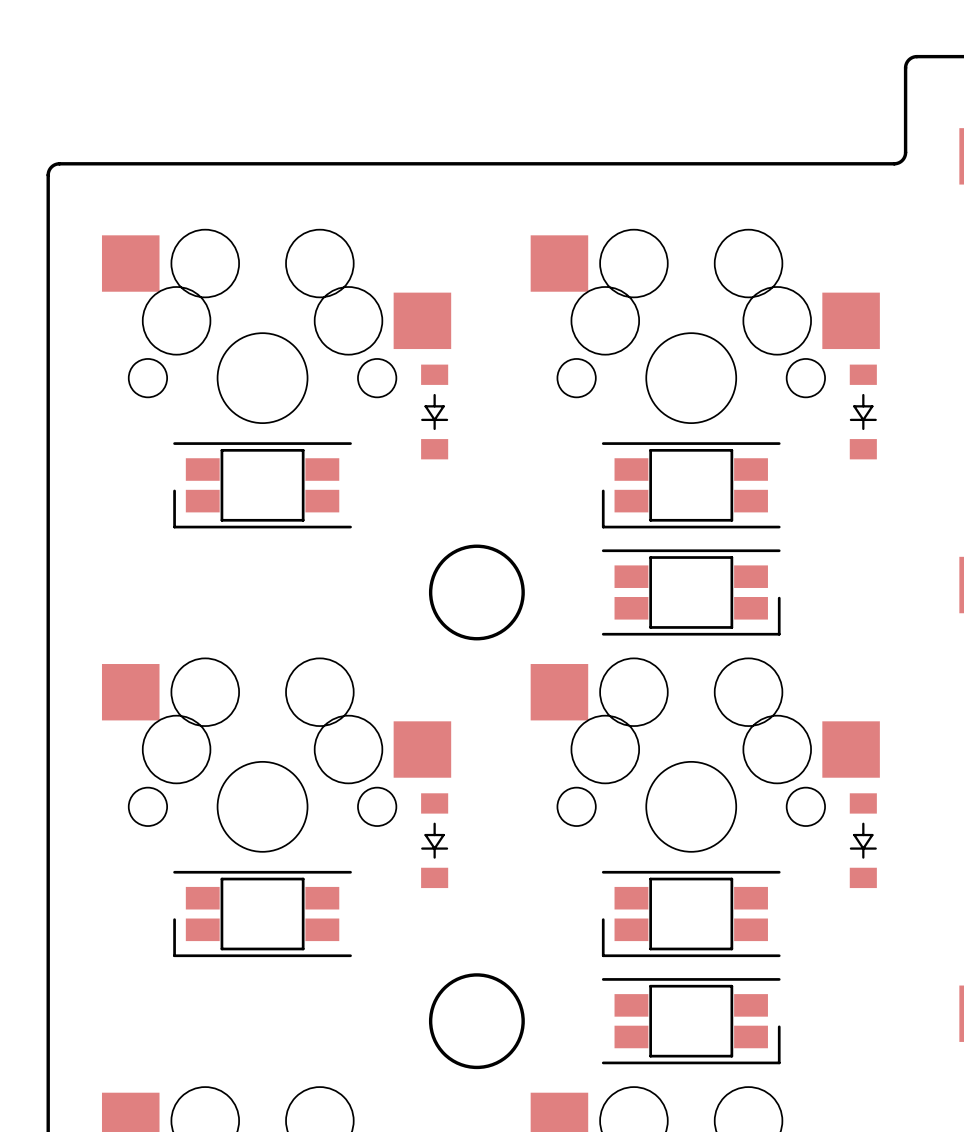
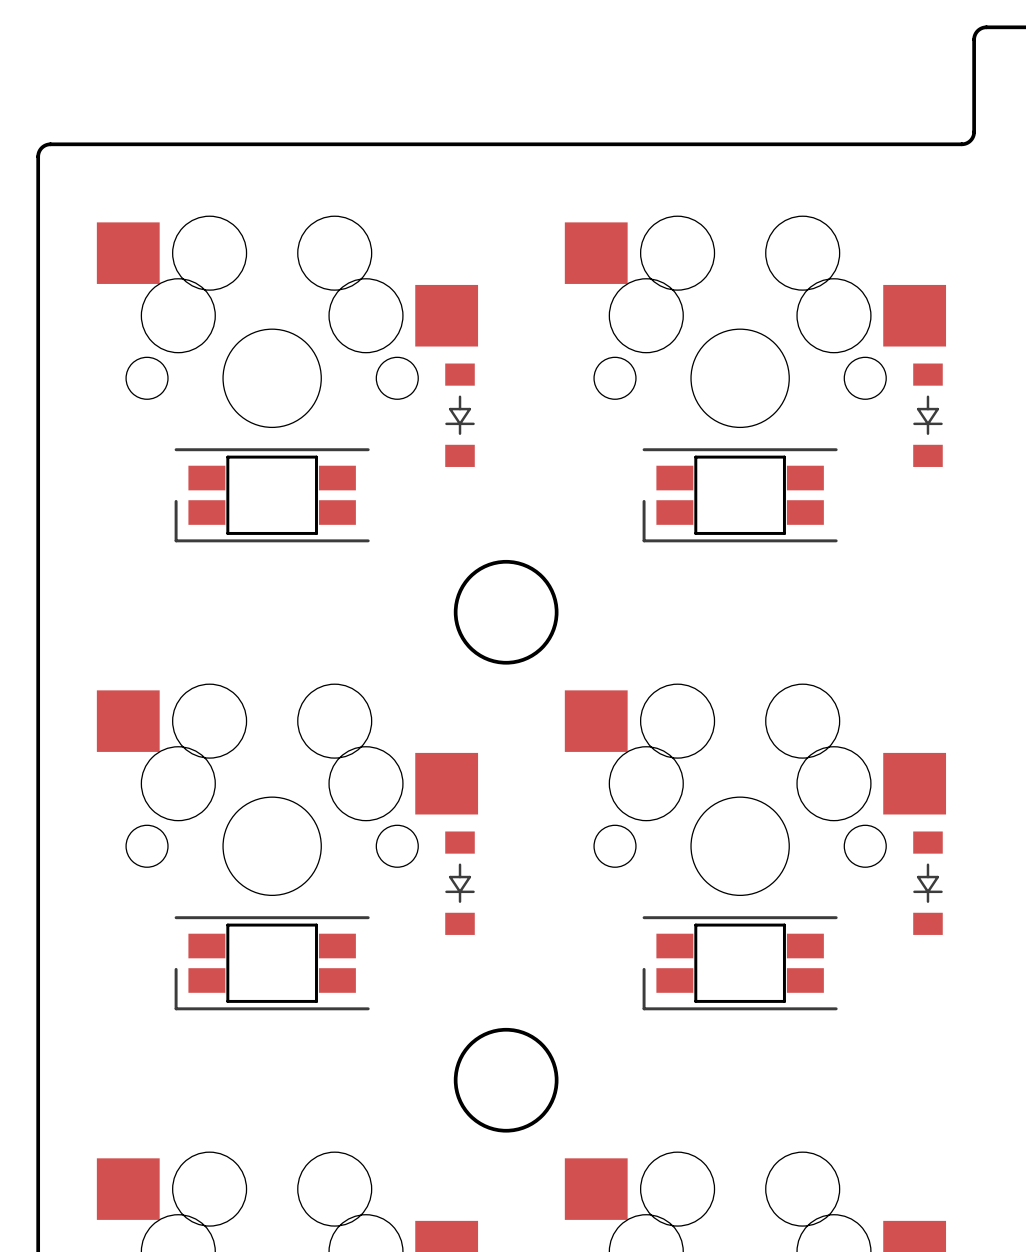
part: (691, 592) -> none
part: (691, 1021) -> none

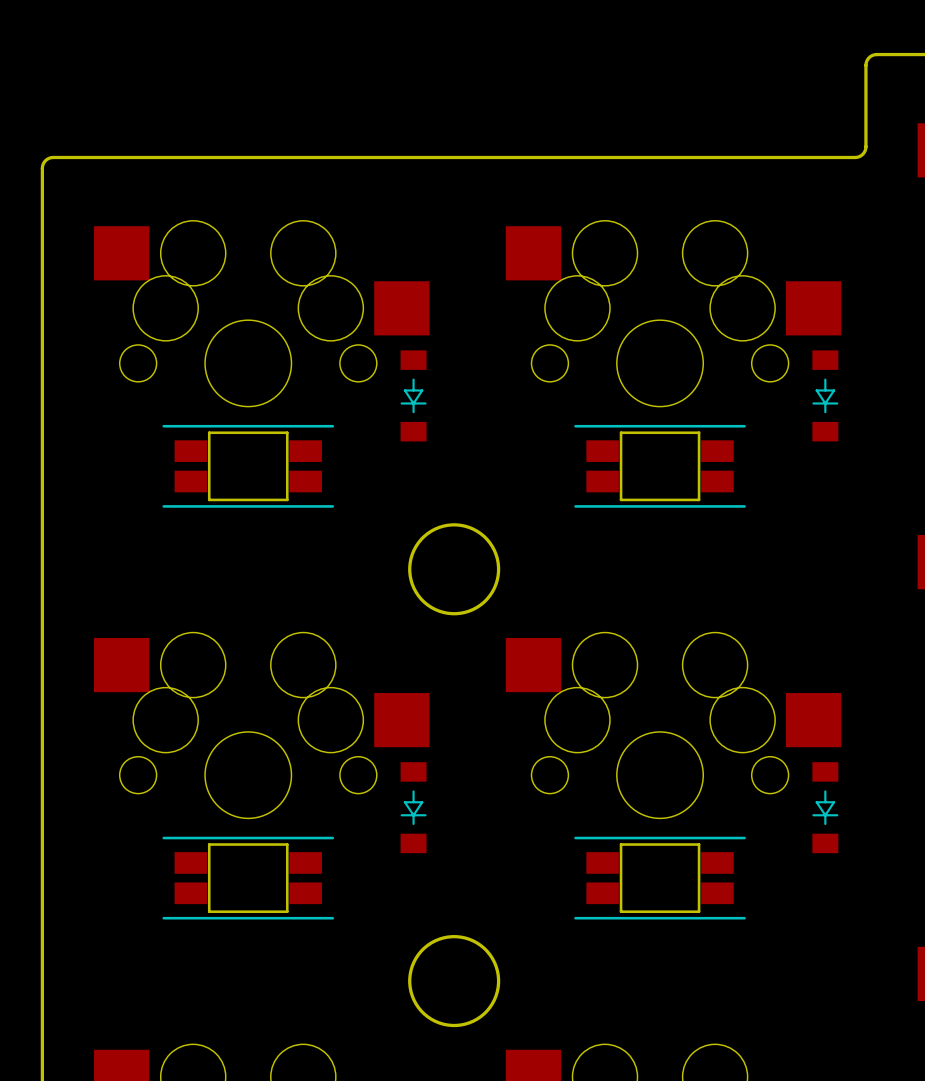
part footprint: [174, 448, 370, 543] -> [162, 424, 335, 508]
part footprint: [642, 448, 838, 543] -> [574, 424, 746, 508]
part footprint: [174, 916, 370, 1011] -> [162, 836, 335, 920]
part footprint: [642, 916, 838, 1011] -> [574, 836, 746, 920]

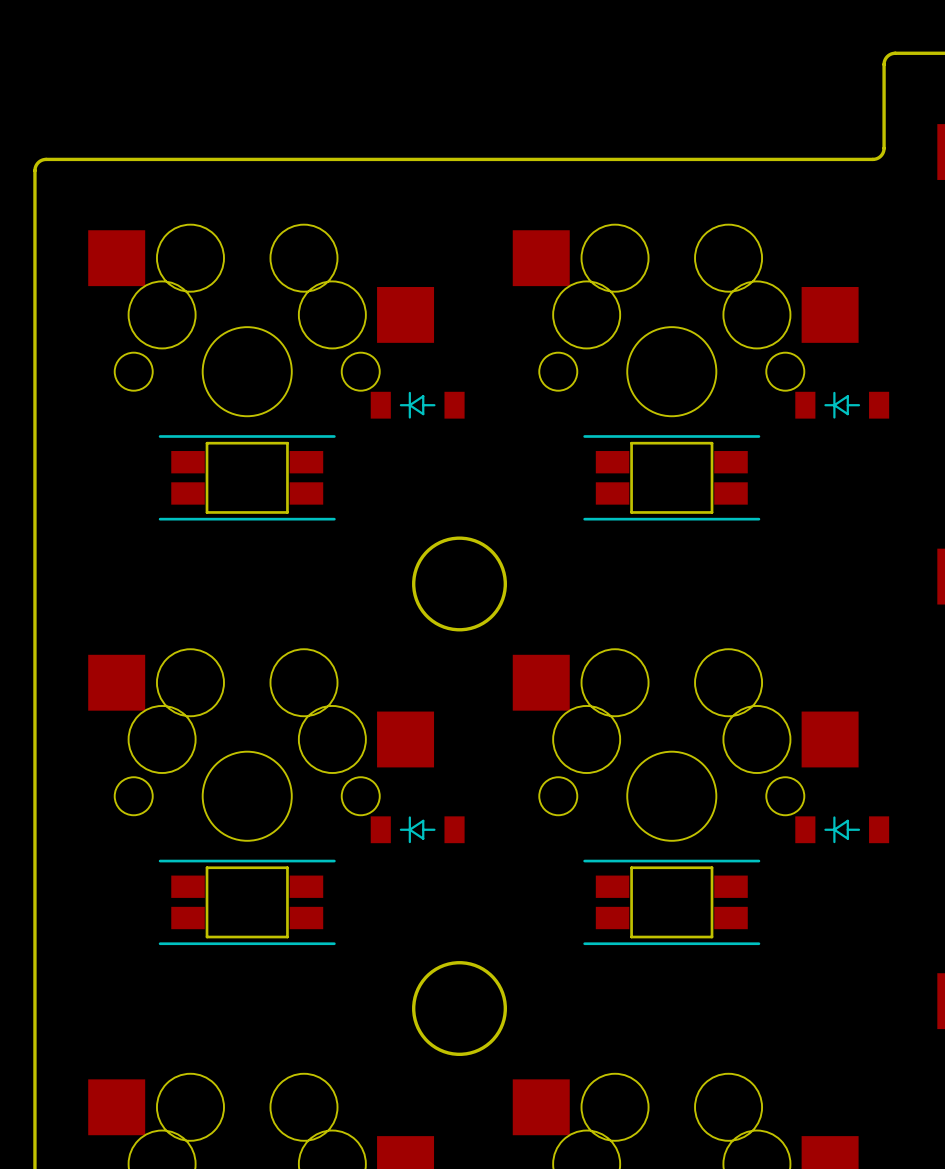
part rotation: 0° (413, 395) -> 90° clockwise (417, 405)
part rotation: 0° (825, 395) -> 90° clockwise (842, 405)
part rotation: 0° (413, 807) -> 90° clockwise (417, 829)
part rotation: 0° (825, 807) -> 90° clockwise (842, 829)

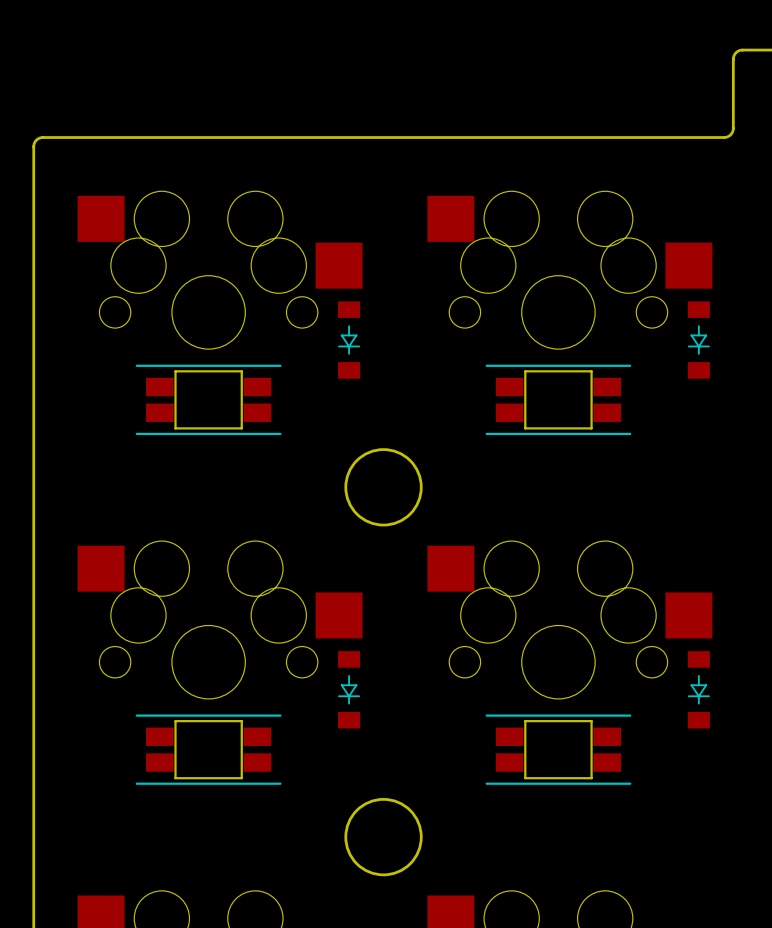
part rotation: 0° (417, 405) -> 90° counterclockwise (349, 340)
part rotation: 0° (842, 405) -> 90° counterclockwise (698, 340)
part rotation: 0° (417, 829) -> 90° counterclockwise (349, 689)
part rotation: 0° (842, 829) -> 90° counterclockwise (698, 689)

